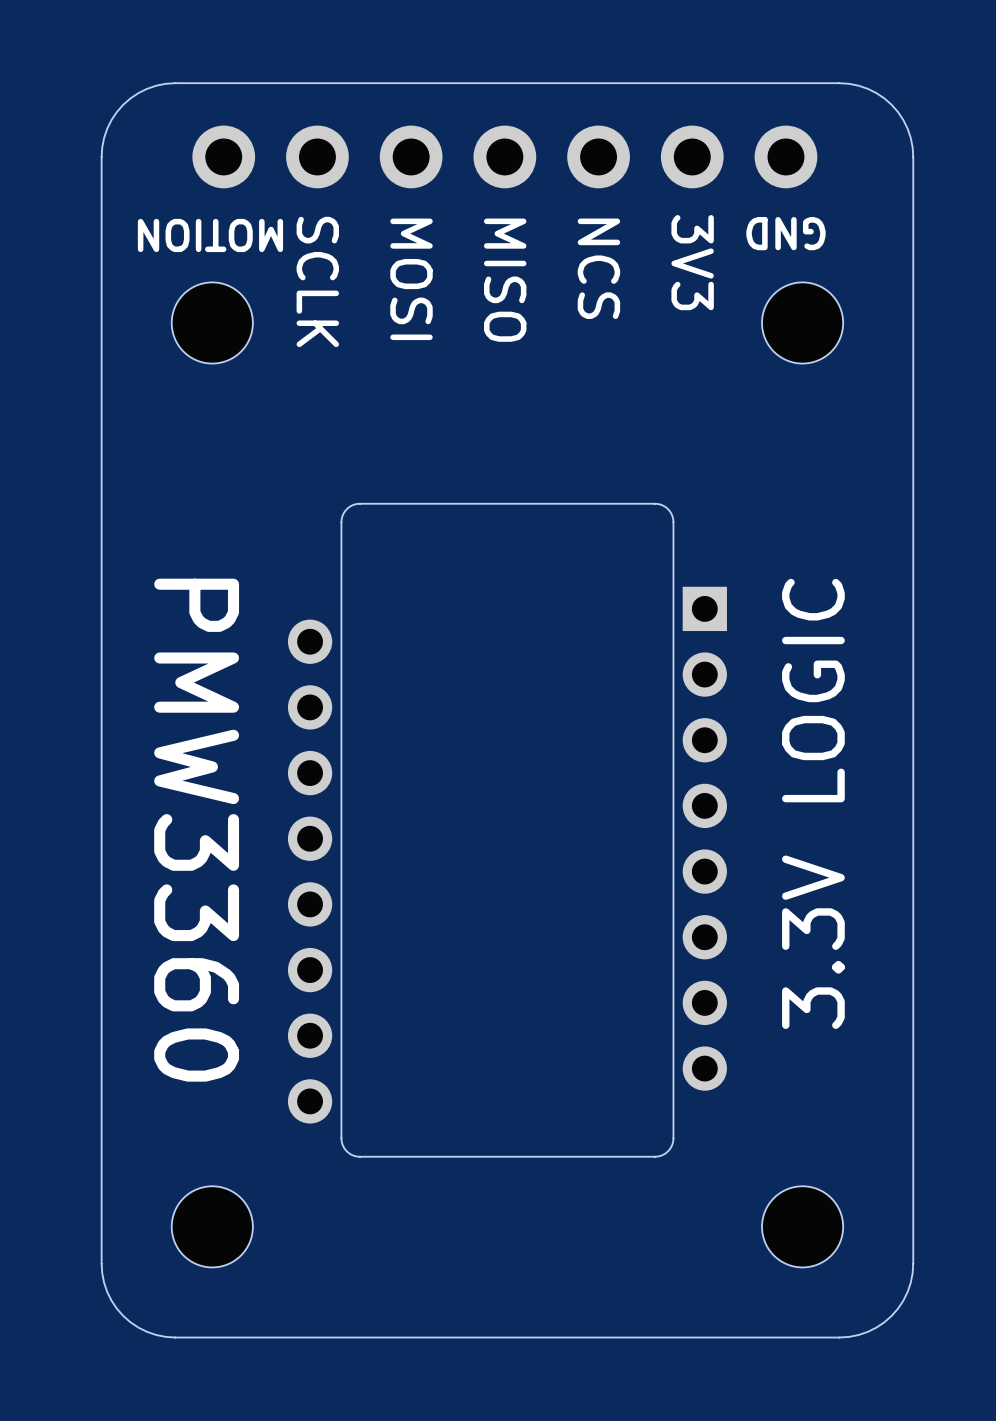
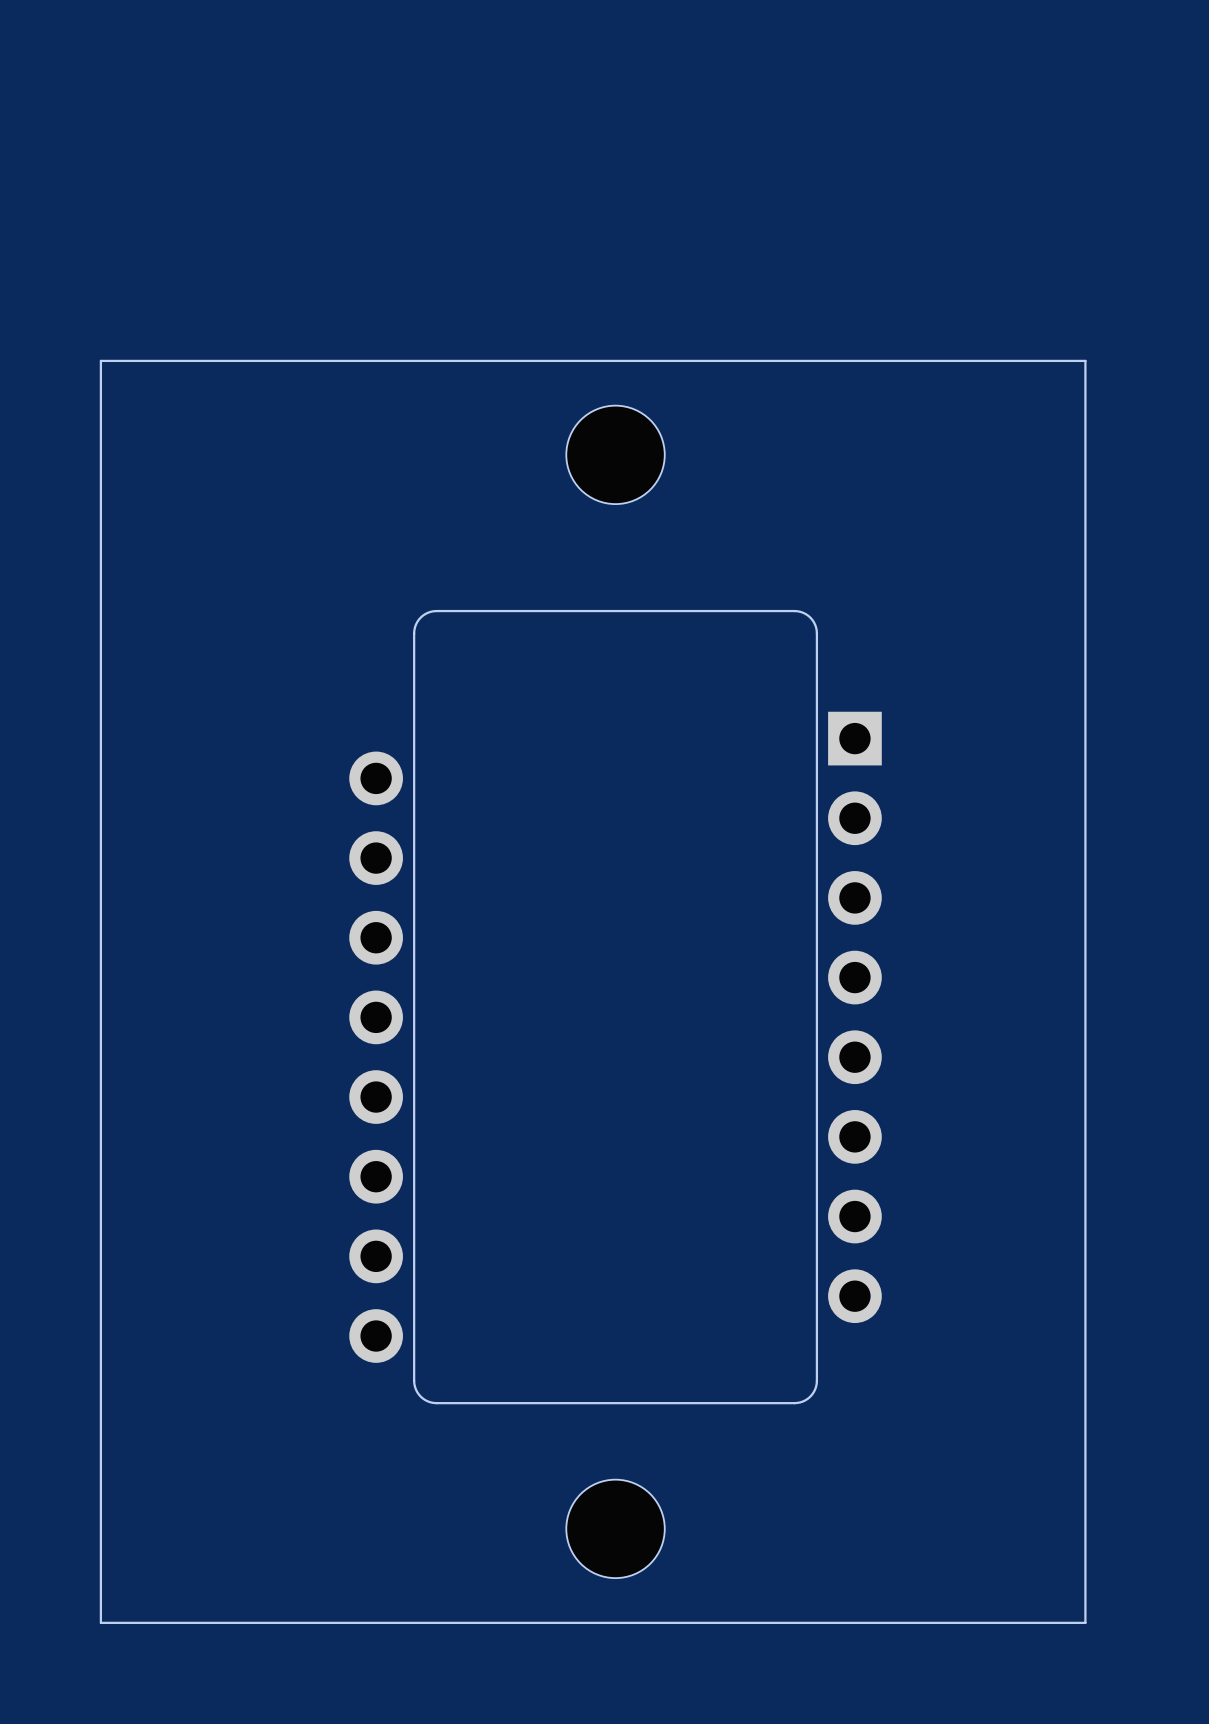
board edge: (839, 83) (175, 83) (156, 85) (138, 93) (123, 104) (111, 120) (104, 137) (101, 156) (101, 1263) (104, 1282) (111, 1300) (123, 1315) (138, 1327) (156, 1335) (175, 1337) (839, 1337) (858, 1335) (876, 1327) (891, 1315) (903, 1300) (910, 1282) (913, 1263) (913, 156) (907, 128) (891, 104) (867, 88) (839, 83) -> (1085, 360) (1085, 1622) (100, 1622) (100, 360) (1085, 360)
part: (504, 156) -> none
text: GND (785, 233) -> none
text: MOTION (210, 235) -> none
text: 3V3 (692, 262) -> none
text: NCS (598, 268) -> none
text: MOSI (411, 279) -> none
text: MISO (505, 280) -> none
text: SCLK (317, 281) -> none
part: (212, 322) -> none
part: (802, 322) -> none
part: none -> (615, 454)
text: 3.3V LOGIC (813, 803) -> none
text: PMW3360 (196, 830) -> none
part: (212, 1226) -> none
part: (802, 1226) -> none
part: none -> (615, 1528)

